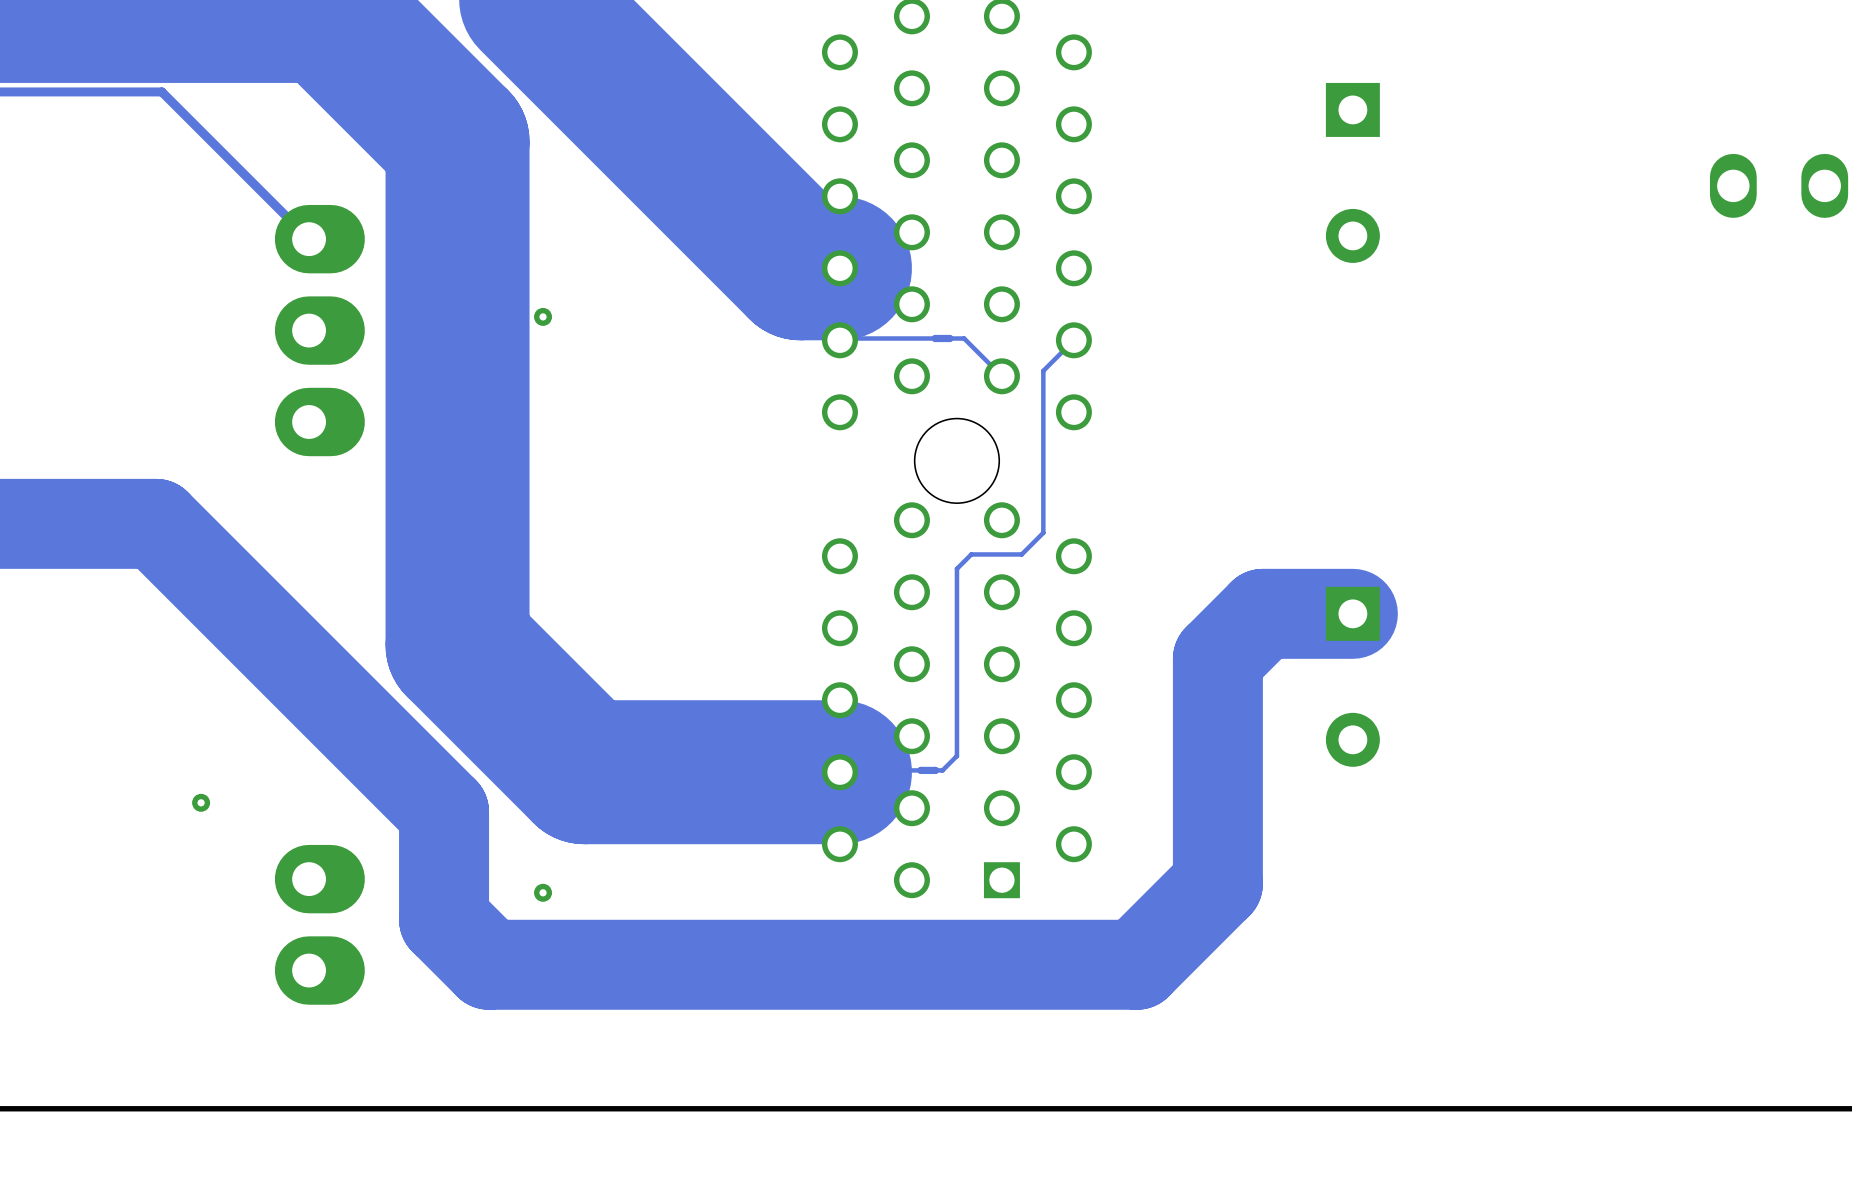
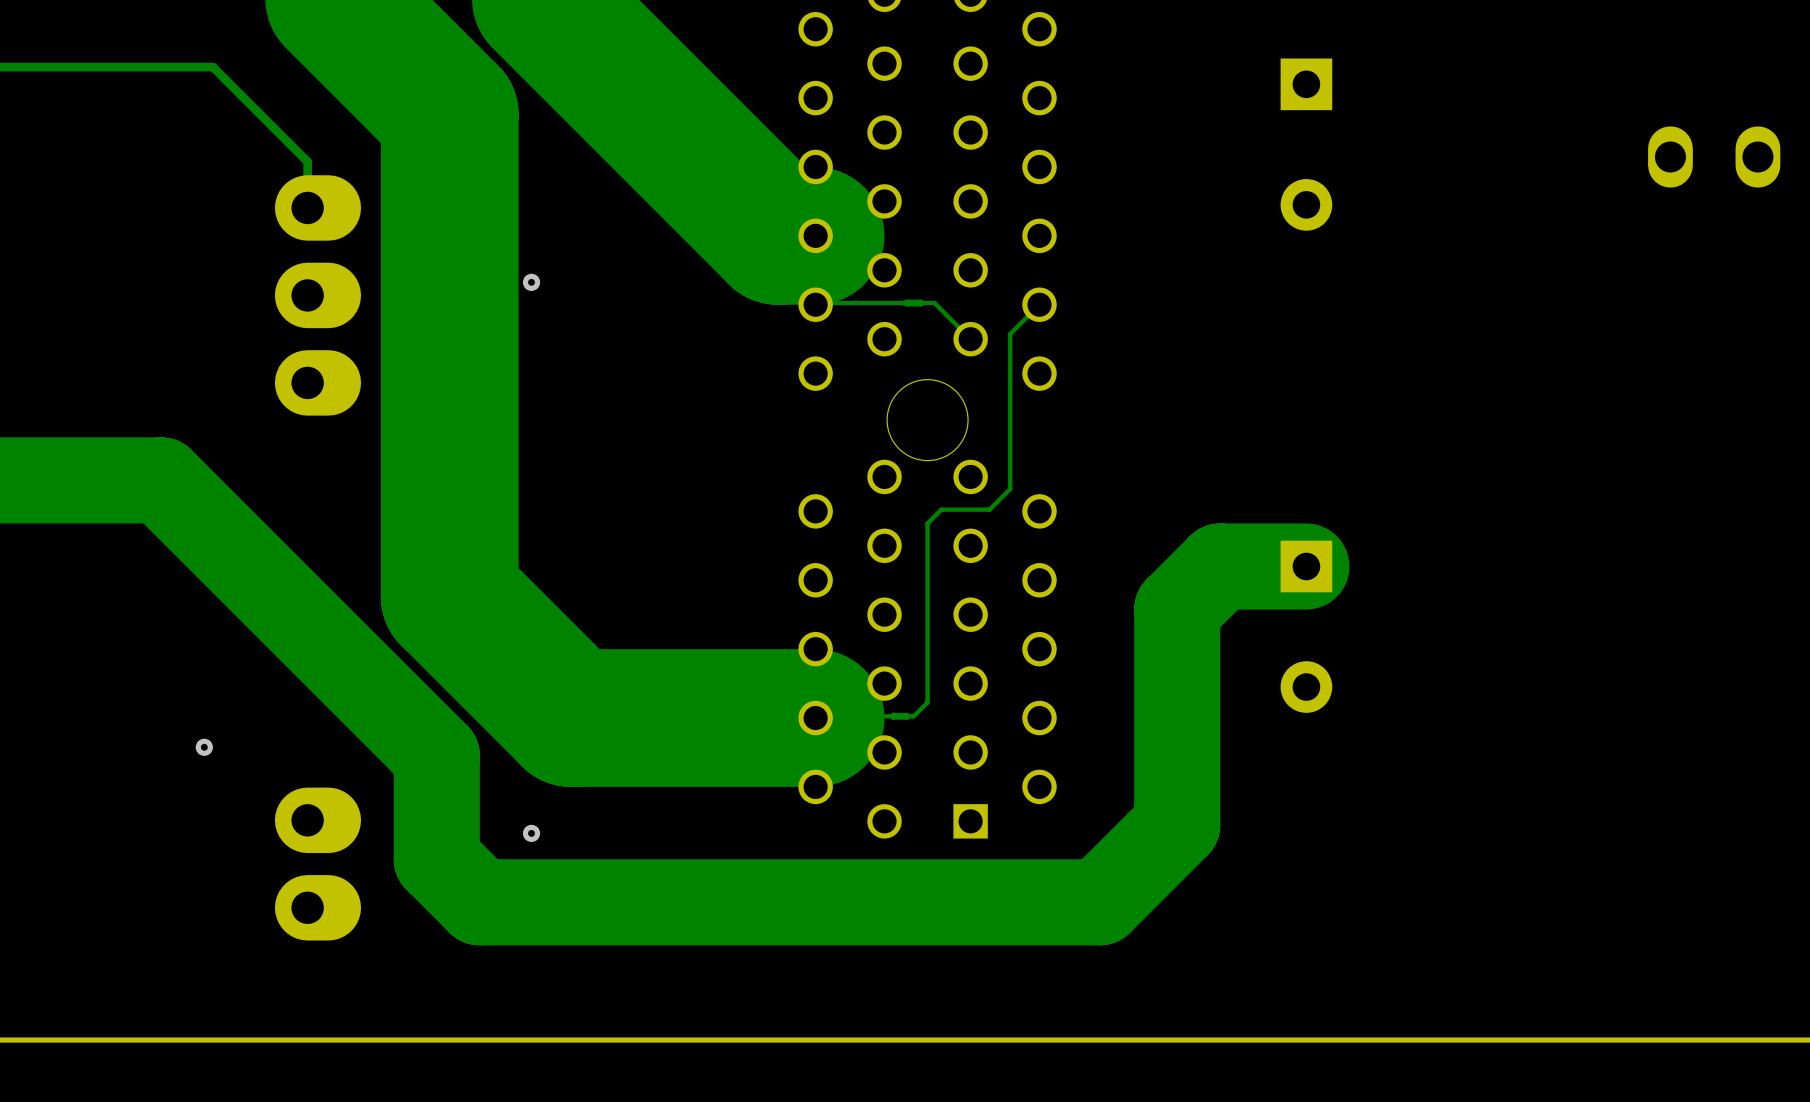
track: (161, 91) (309, 239) -> (166, 67) (212, 67) (307, 161) (307, 207)

